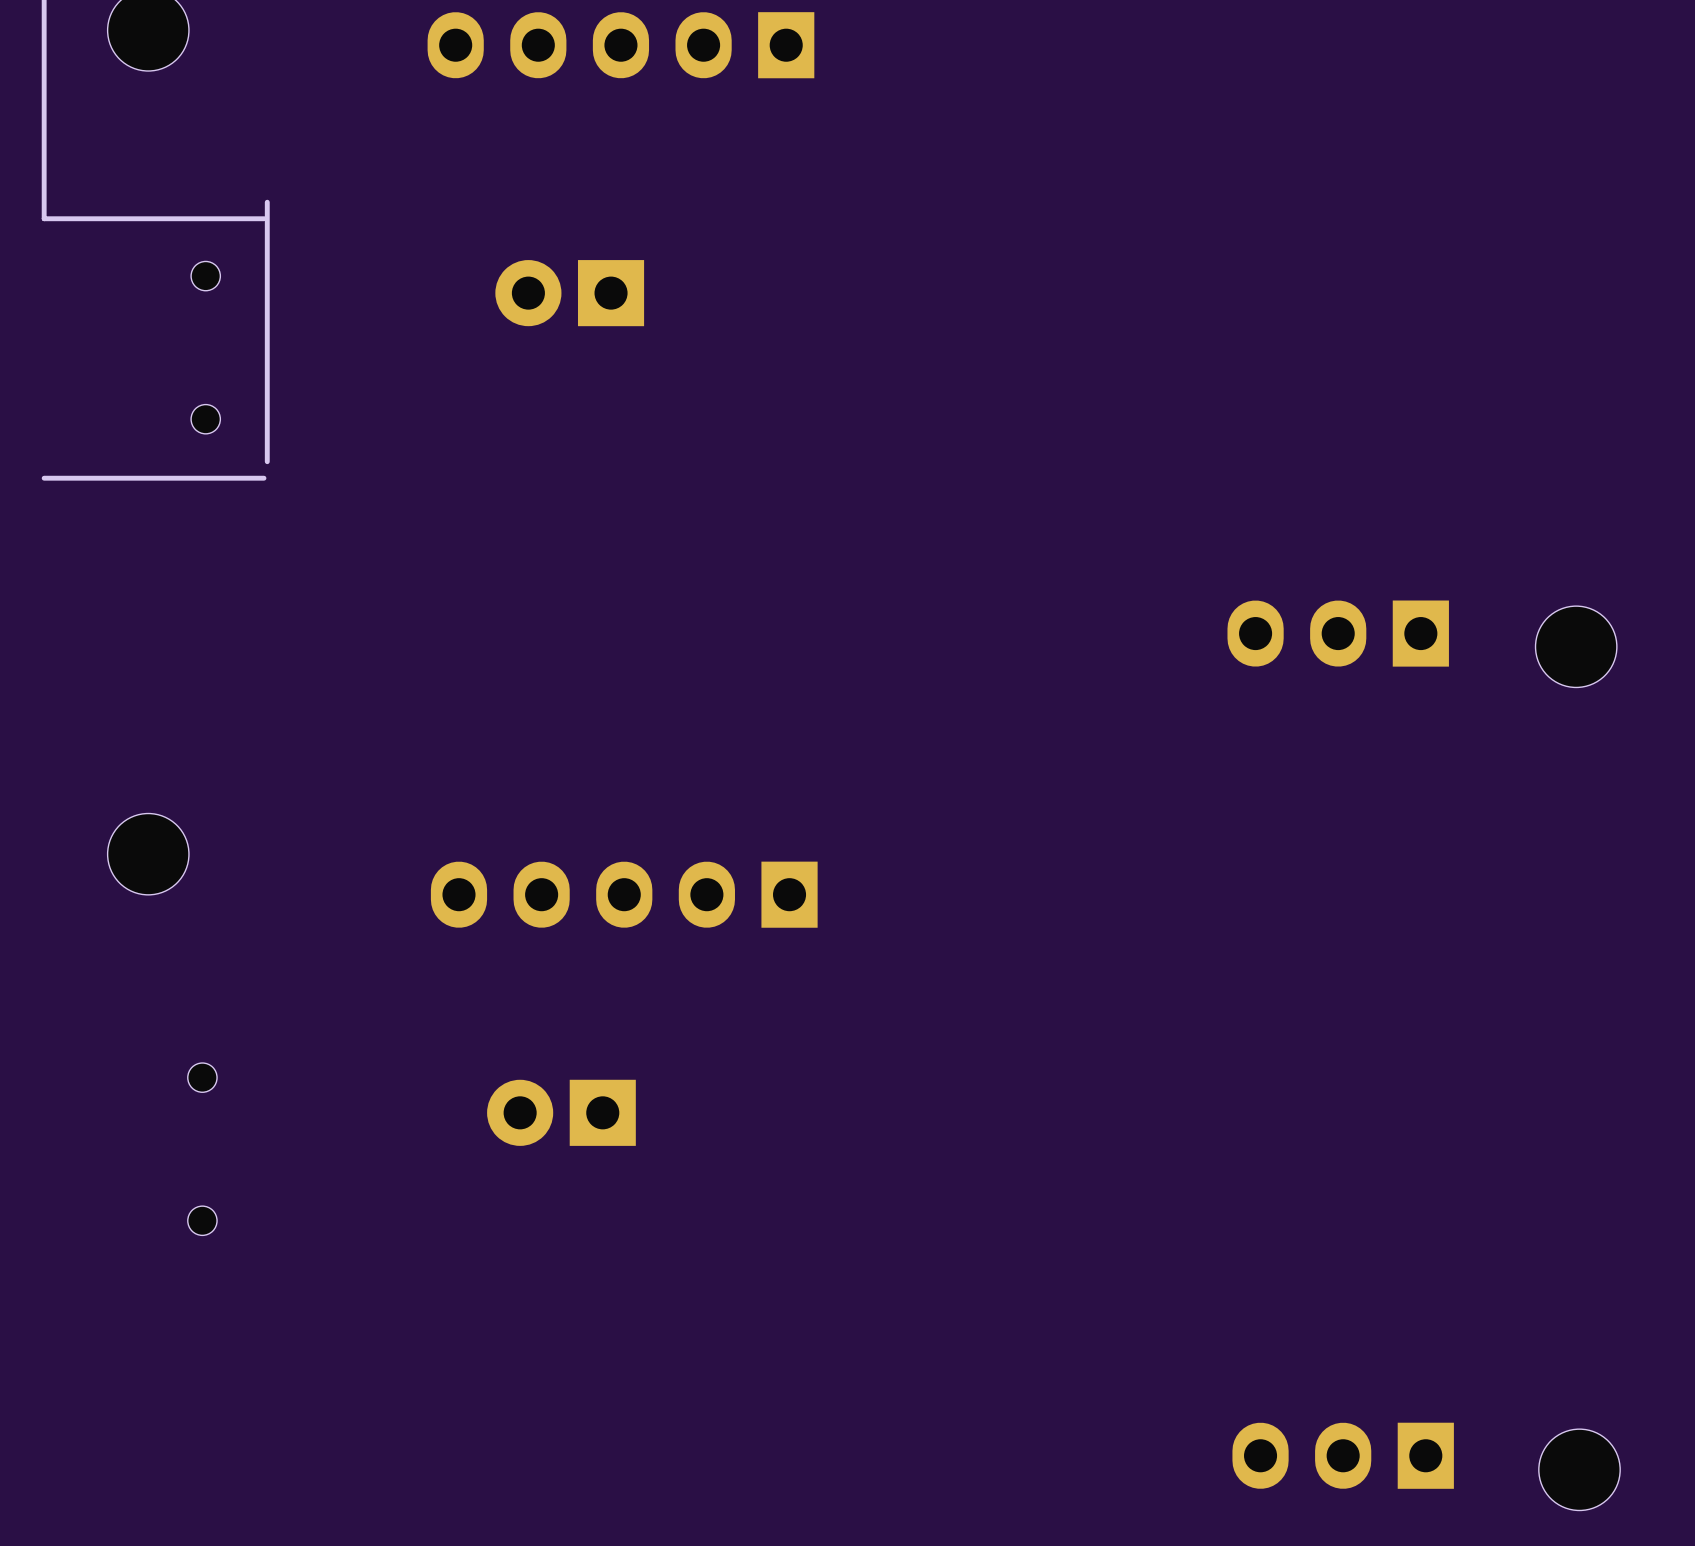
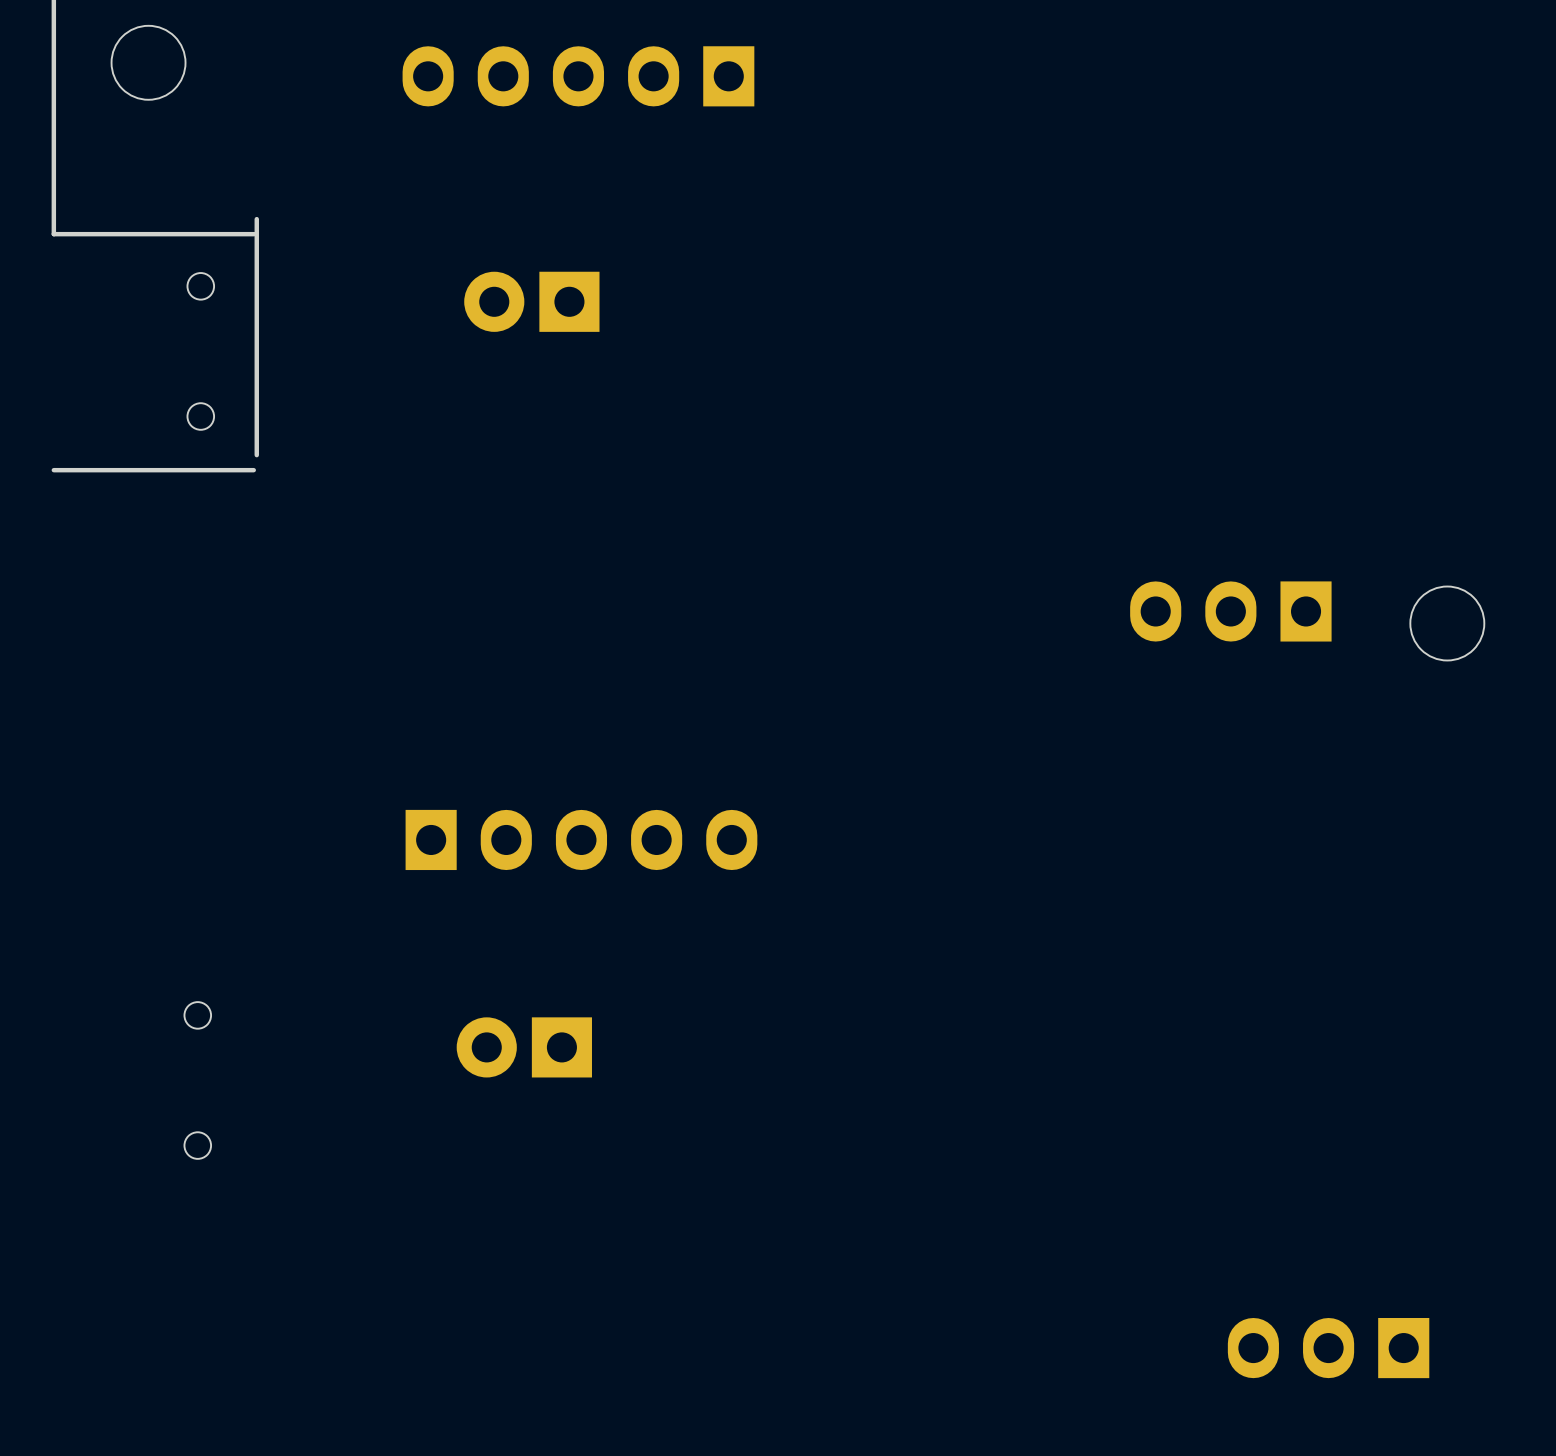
part: (148, 854) -> none
part rotation: 0° (624, 894) -> 180° (581, 839)
part position: (1343, 1455) -> (1328, 1348)
part: (1579, 1469) -> none

